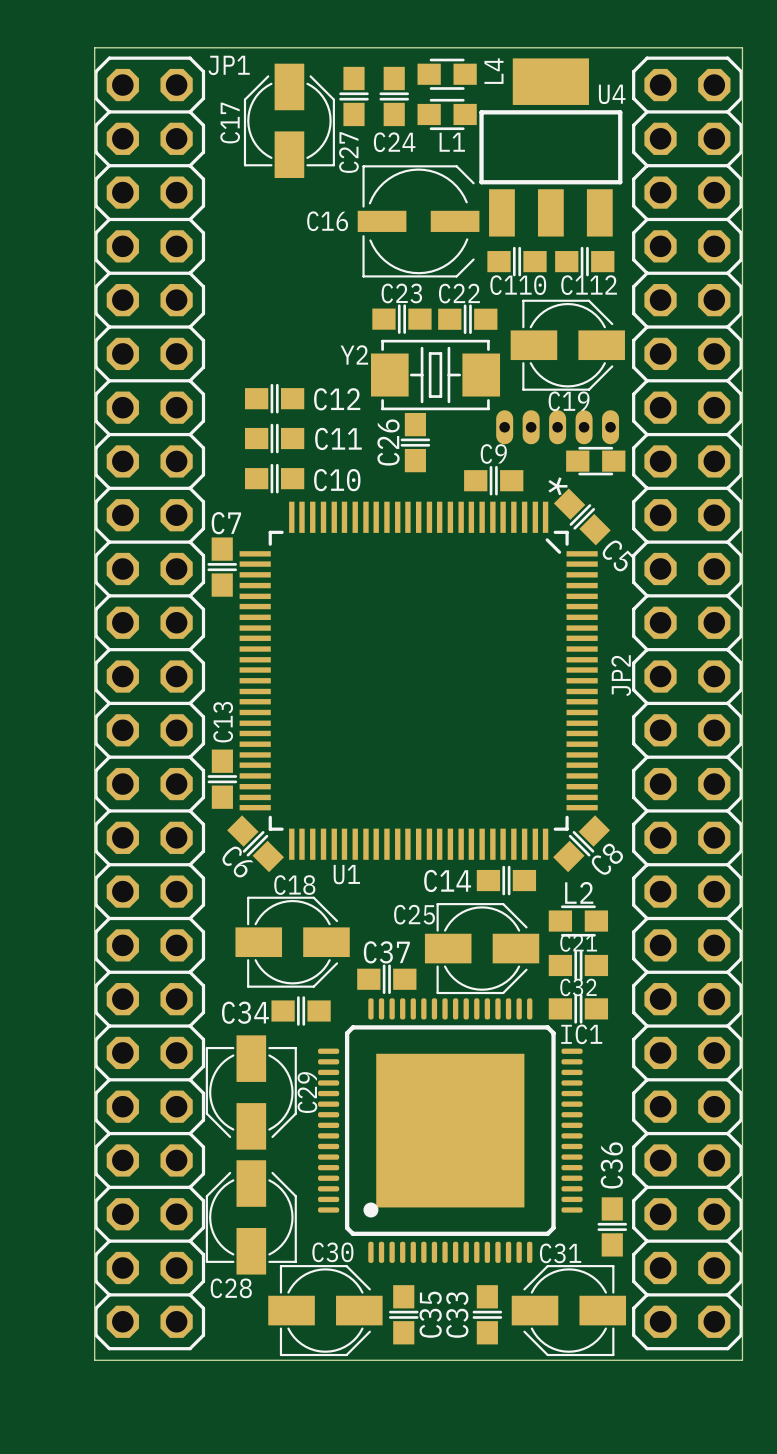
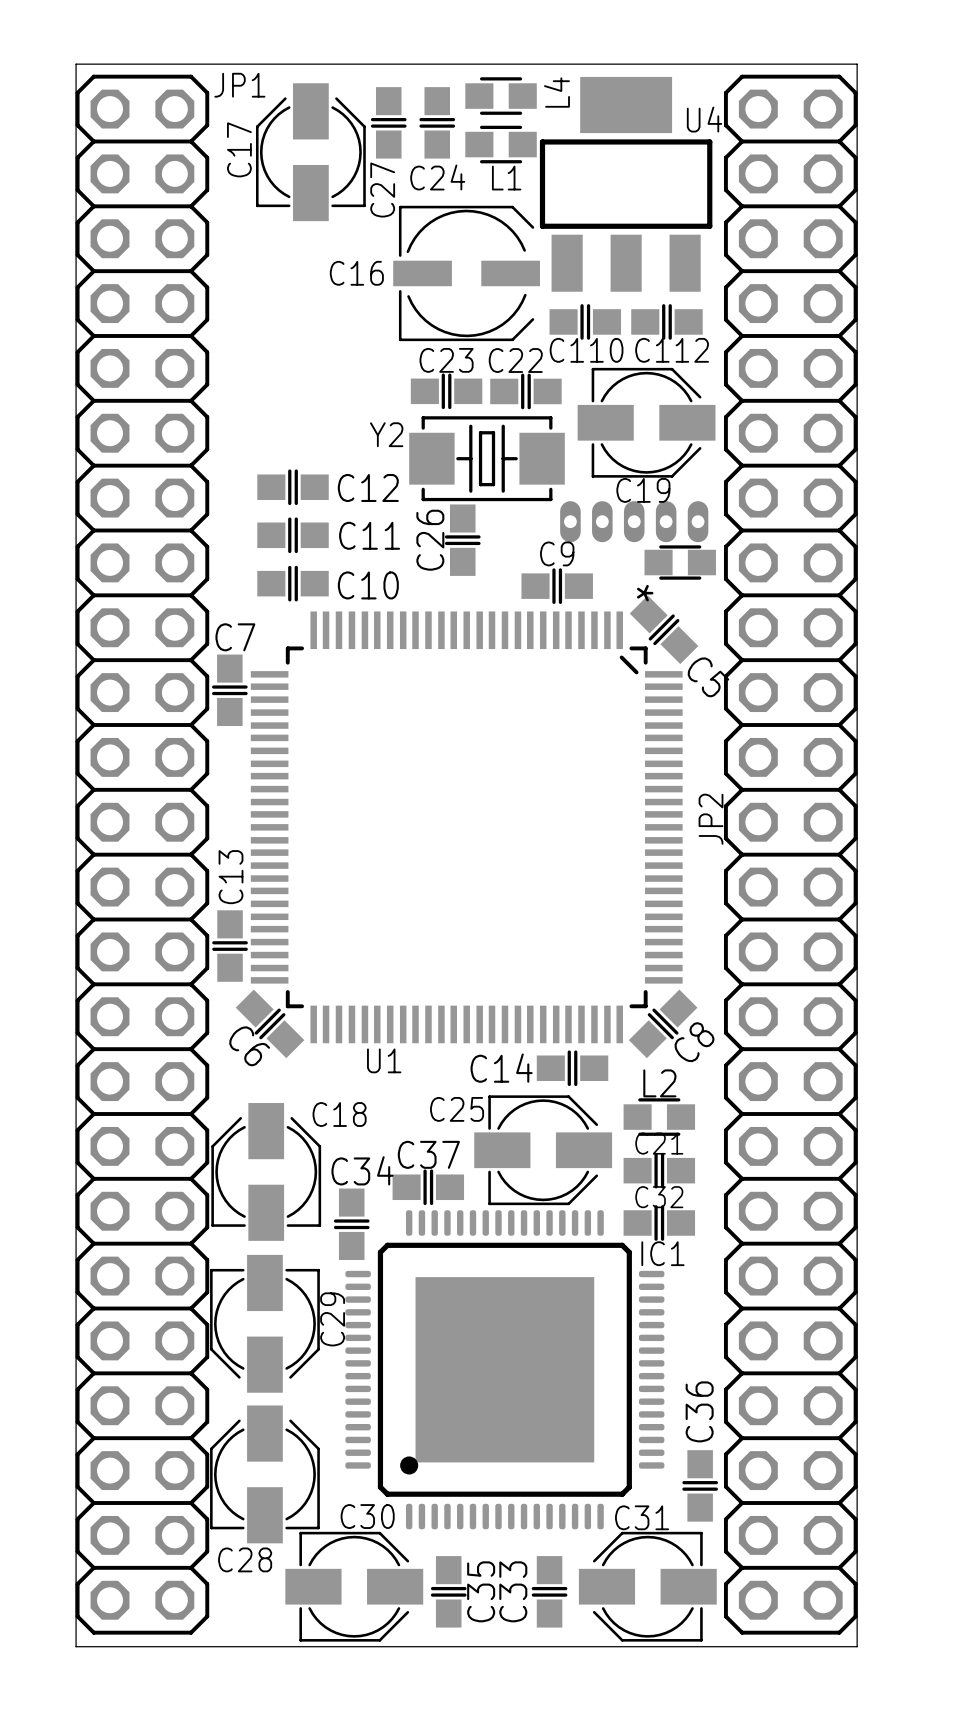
C18 name position: C18 (294, 885) -> C18 (339, 1114)
C18 rotation: 0° (292, 942) -> 90° counterclockwise (266, 1171)
C34 rotation: 0° (301, 1011) -> 90° clockwise (351, 1224)

